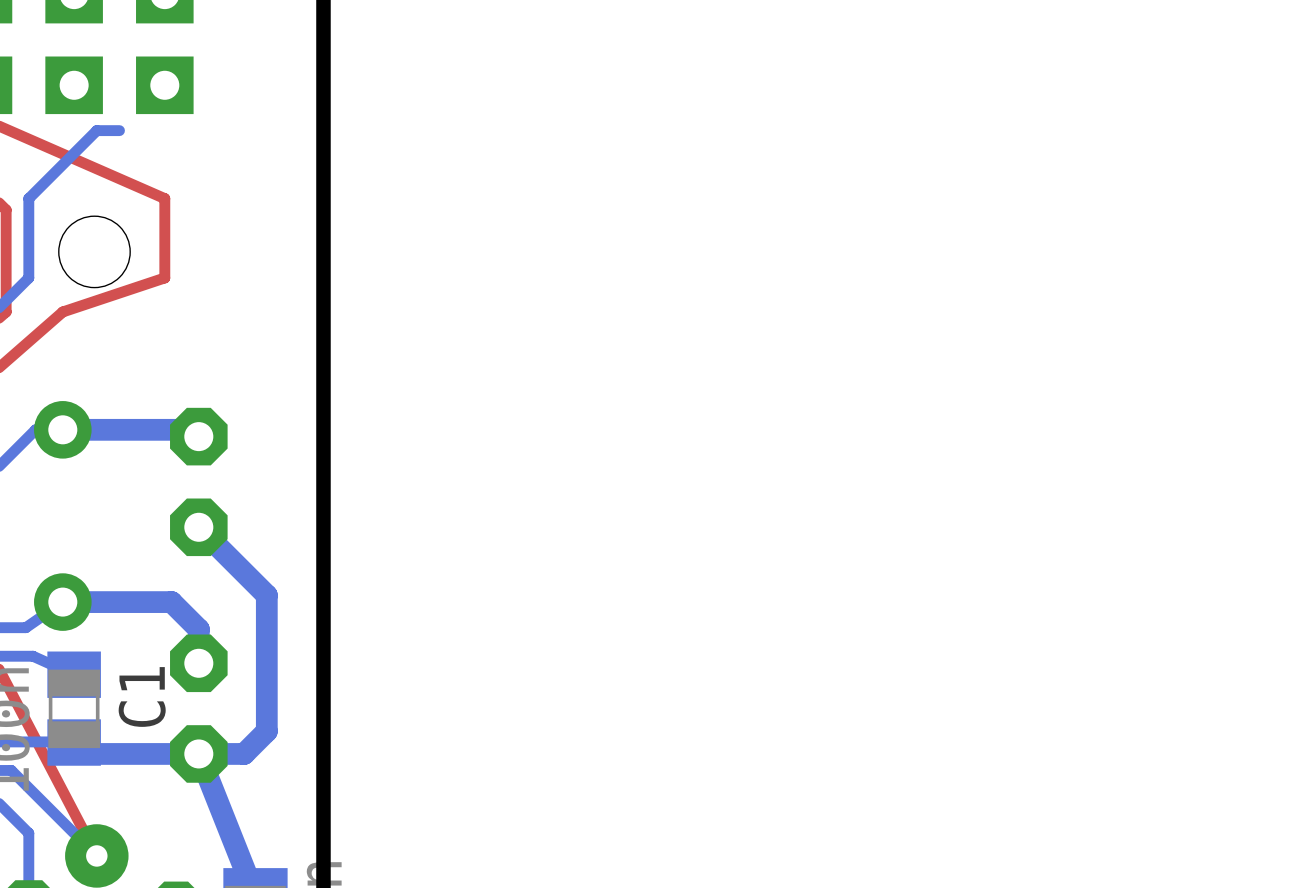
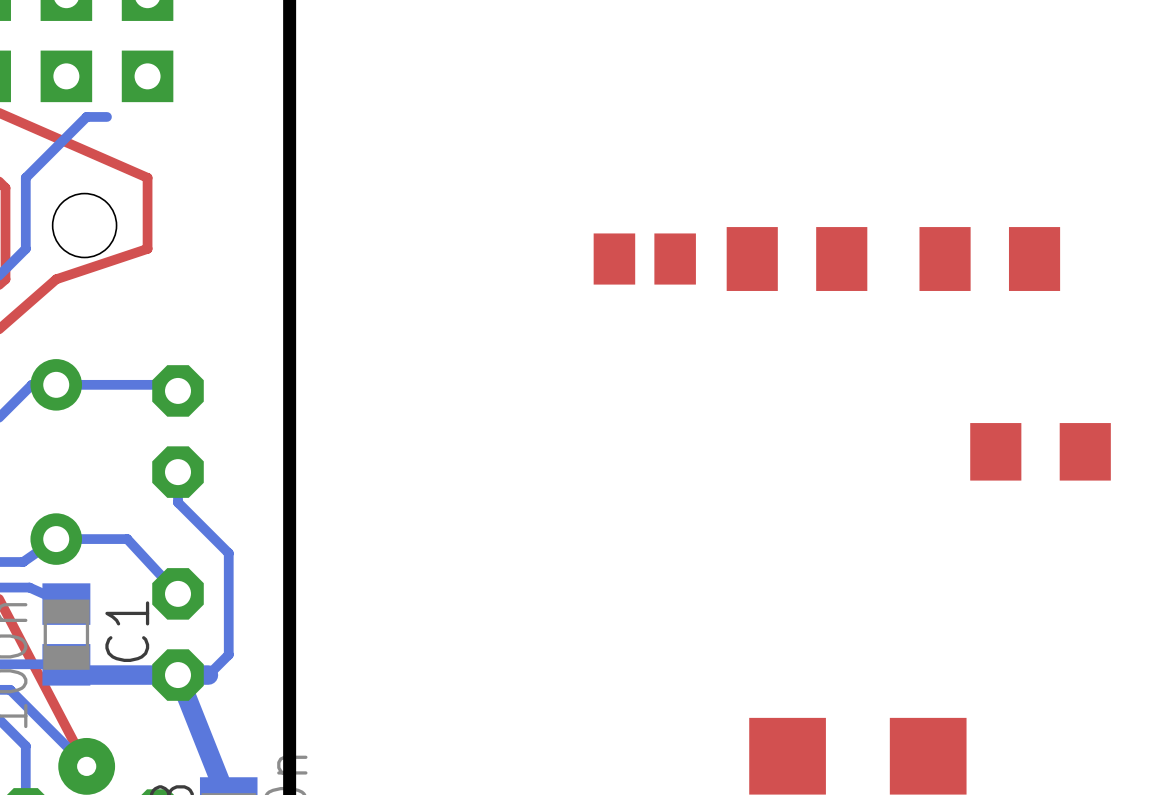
part: none -> (644, 259)
part: none -> (796, 259)
part: none -> (989, 259)
bottom track width: thick (62, 429) (192, 429) (198, 436) -> thin (56, 384) (171, 384) (178, 390)
part: none -> (1040, 451)
bottom track: (198, 527) (266, 595) (266, 731) (244, 753) (232, 753) -> (178, 472) (178, 502) (228, 553) (228, 654) (208, 675)
bottom track: (142, 602) (171, 602) (198, 629) (198, 663) -> (127, 539) (178, 593)
bottom track width: thick (142, 602) (62, 602) -> thin (127, 539) (56, 539)
part: none -> (857, 756)

